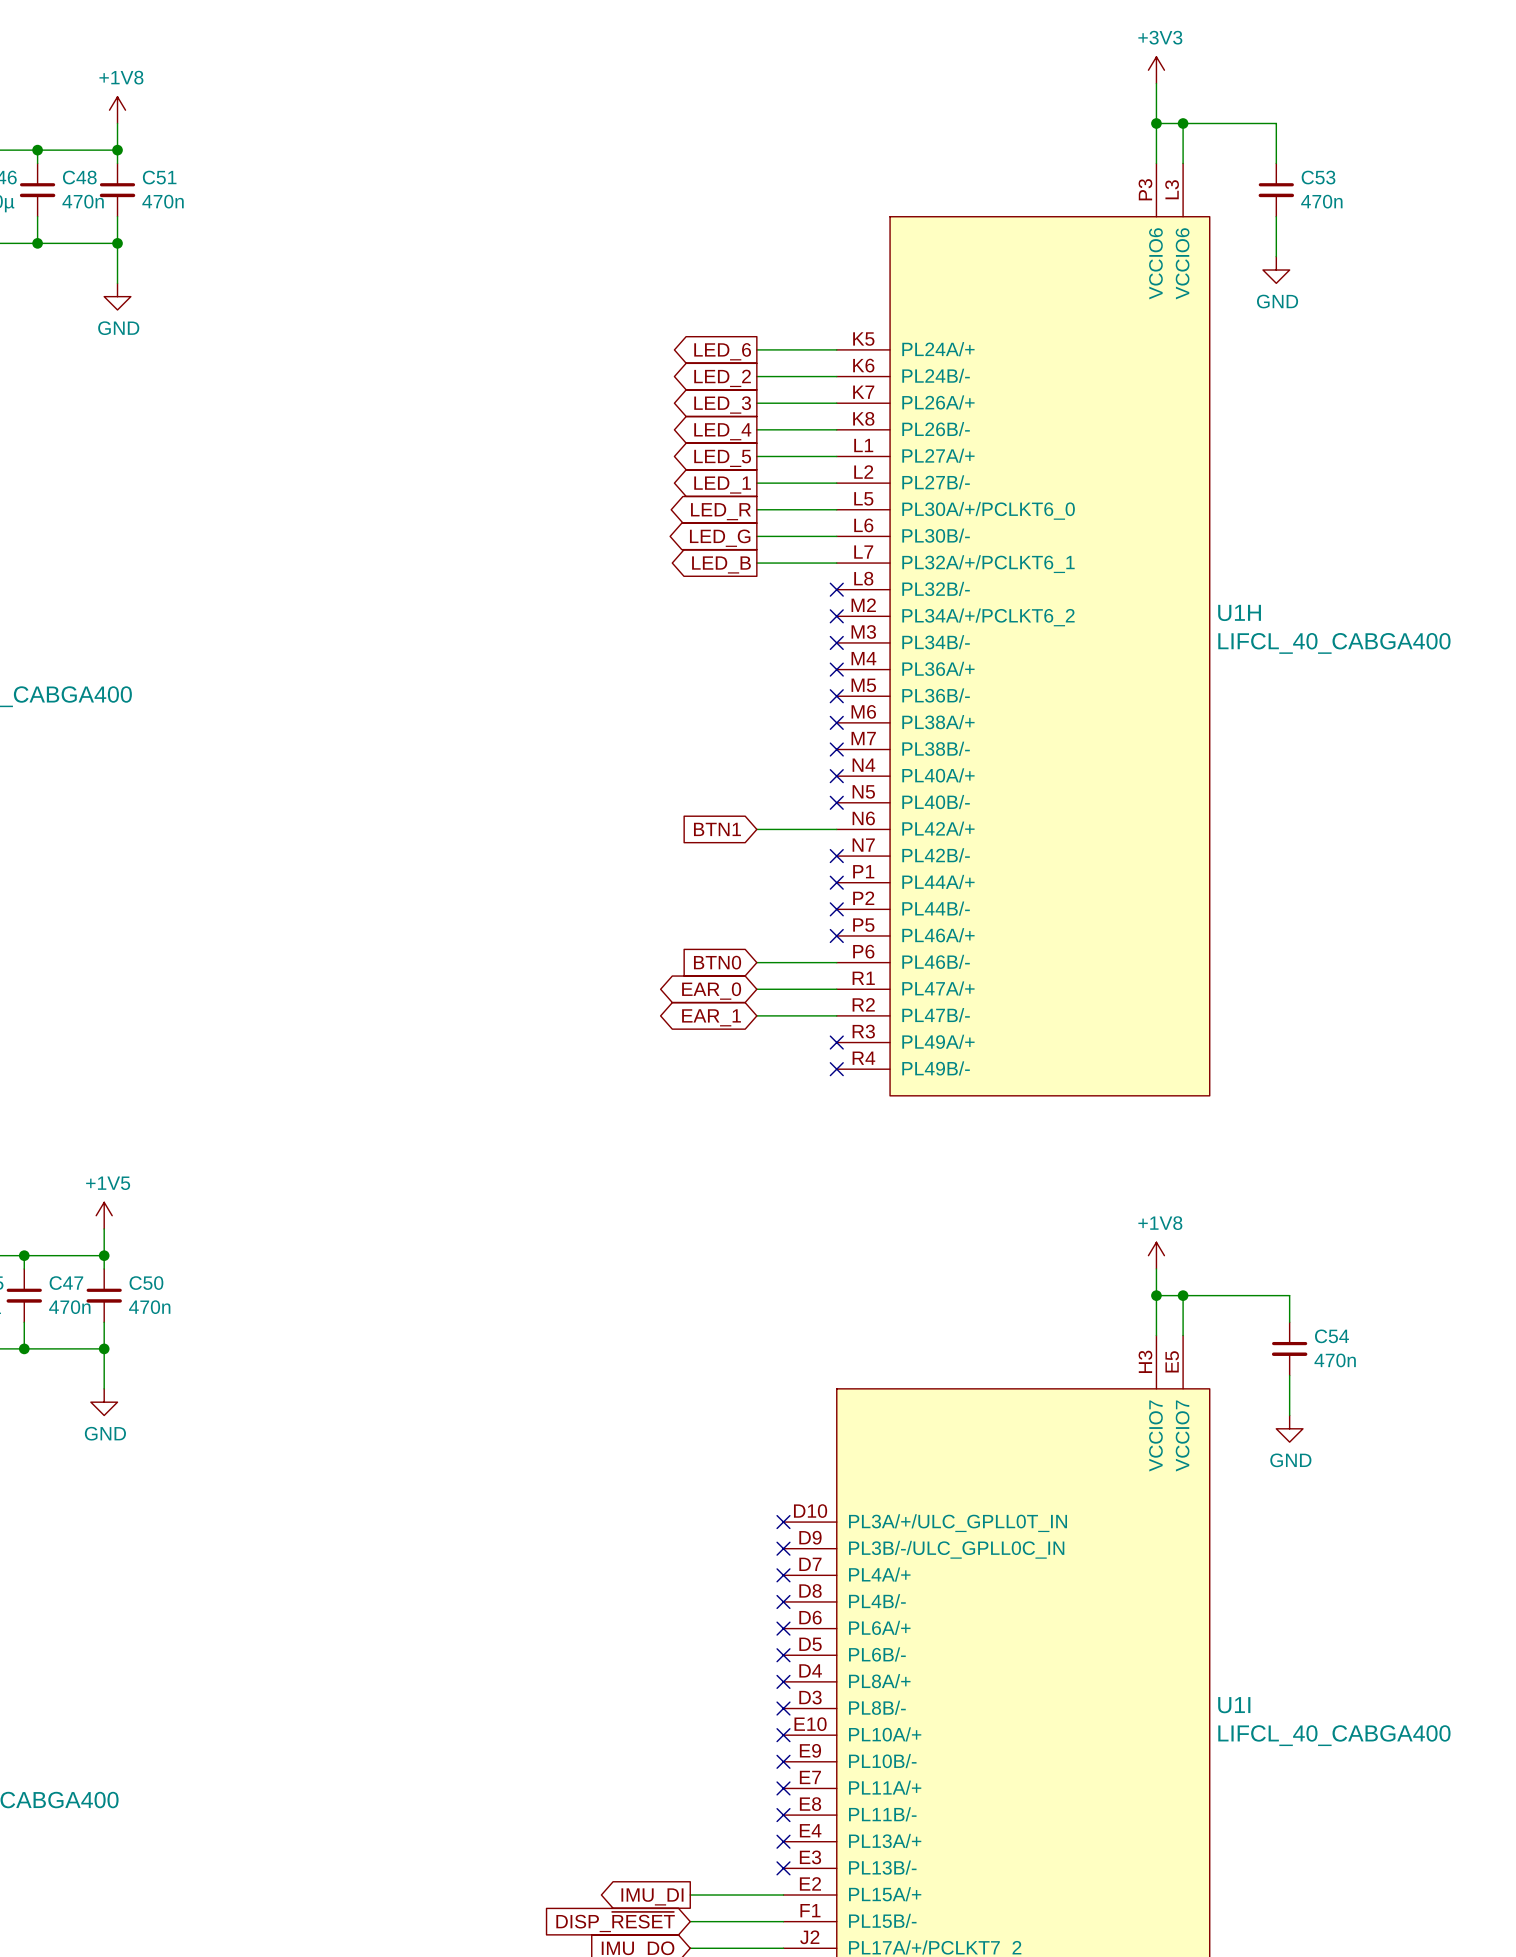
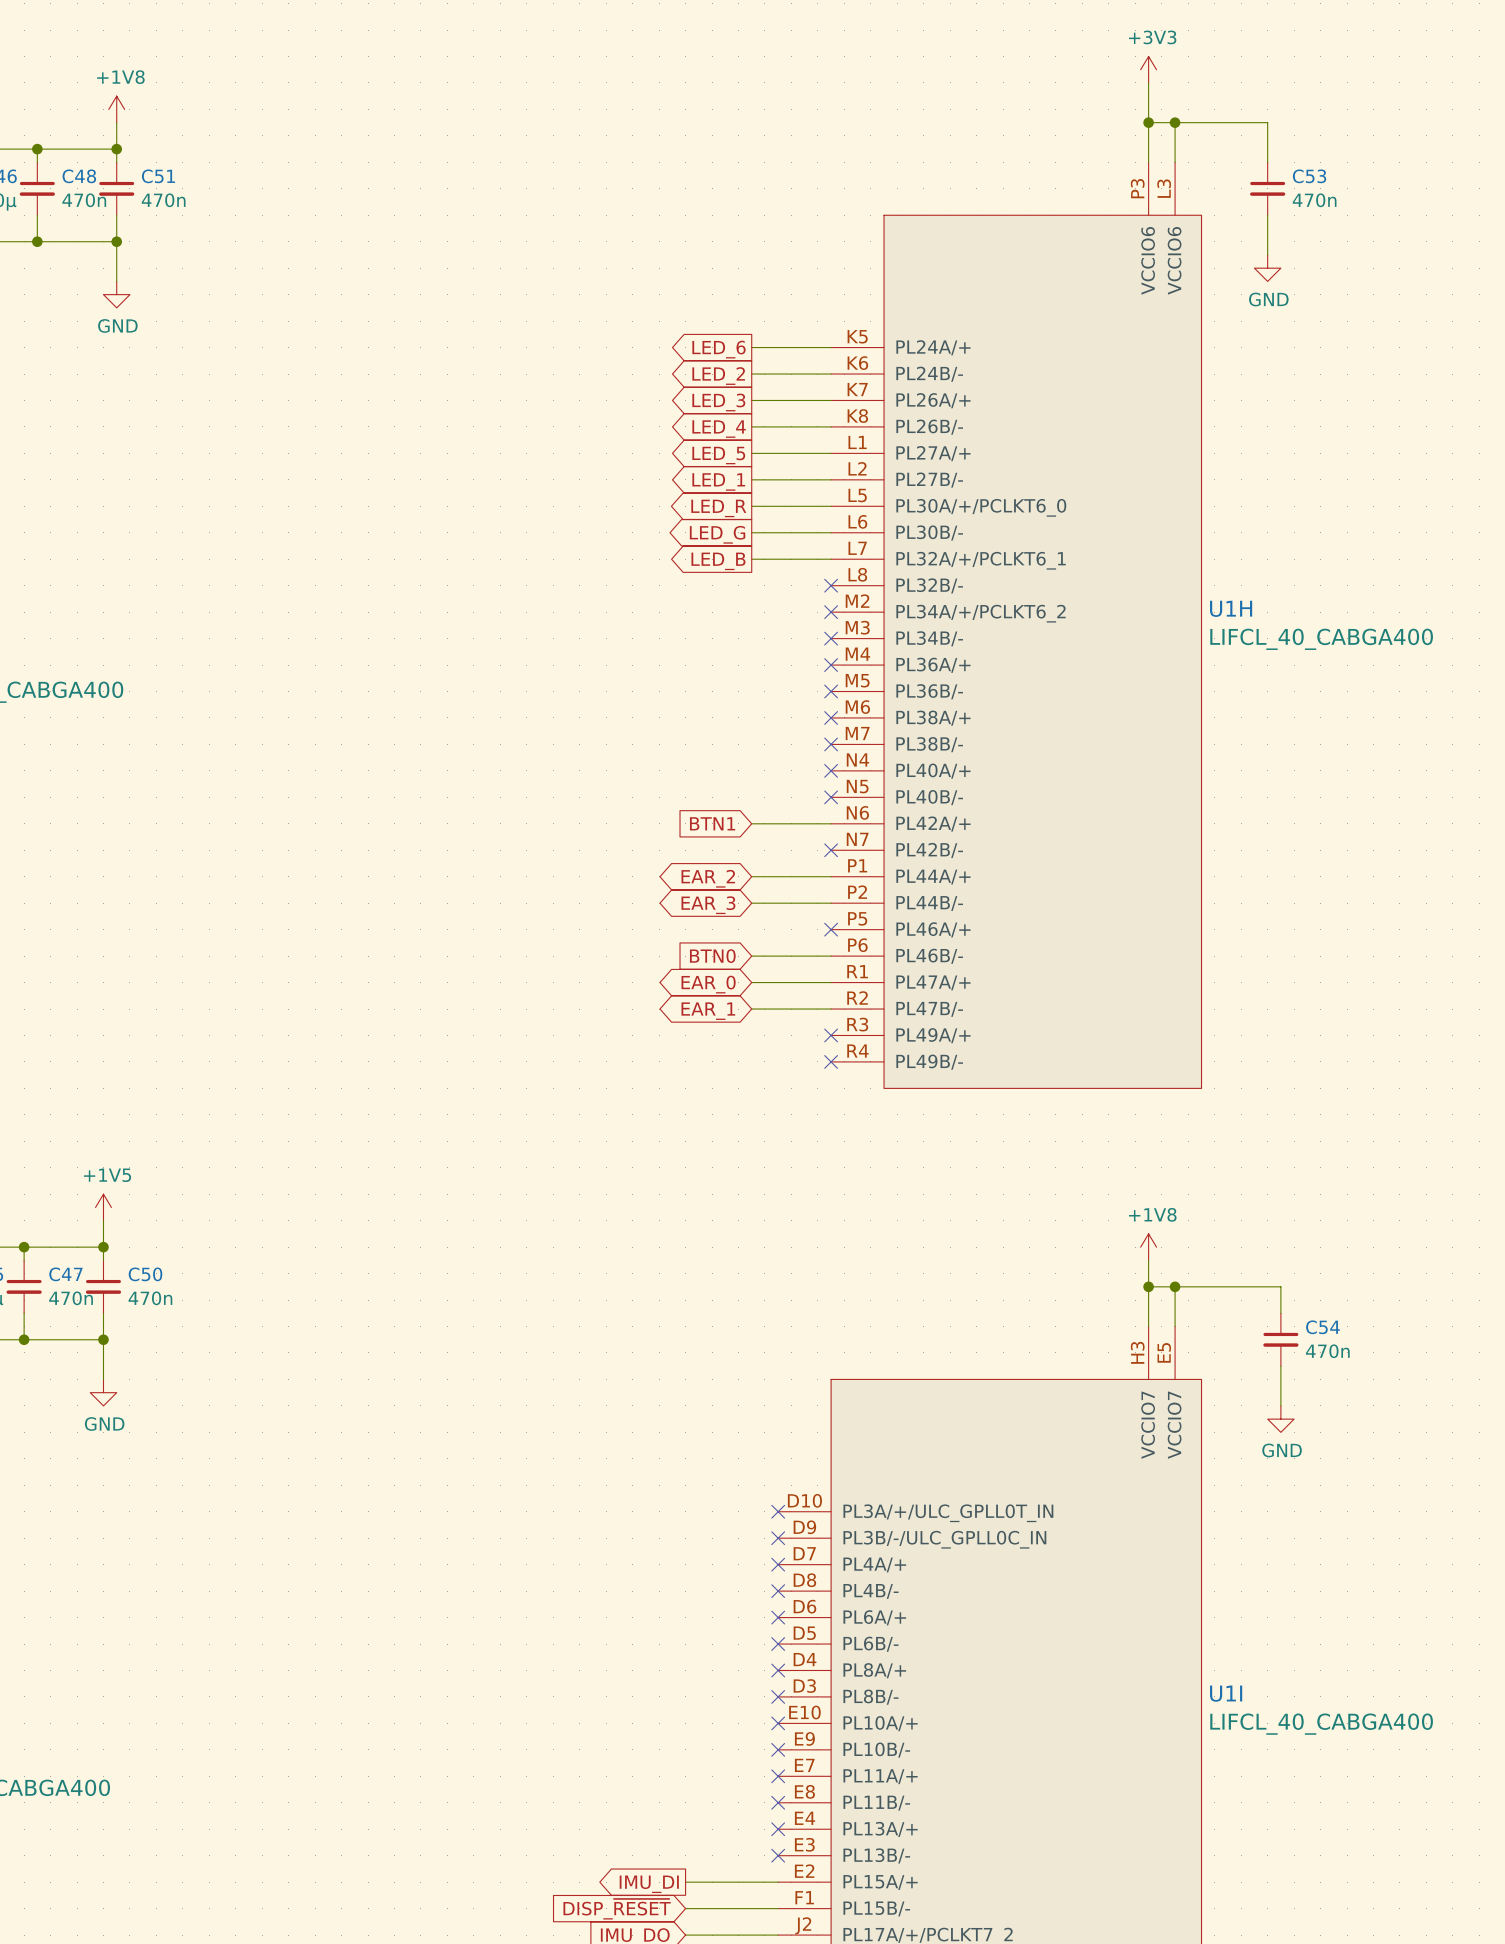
wire: none -> (751, 876) (831, 876)
no-connect mark: (836, 882) -> none
global label: none -> EAR_2 (708, 878)
wire: none -> (751, 903) (831, 903)
no-connect mark: (836, 909) -> none
global label: none -> EAR_3 (708, 905)

